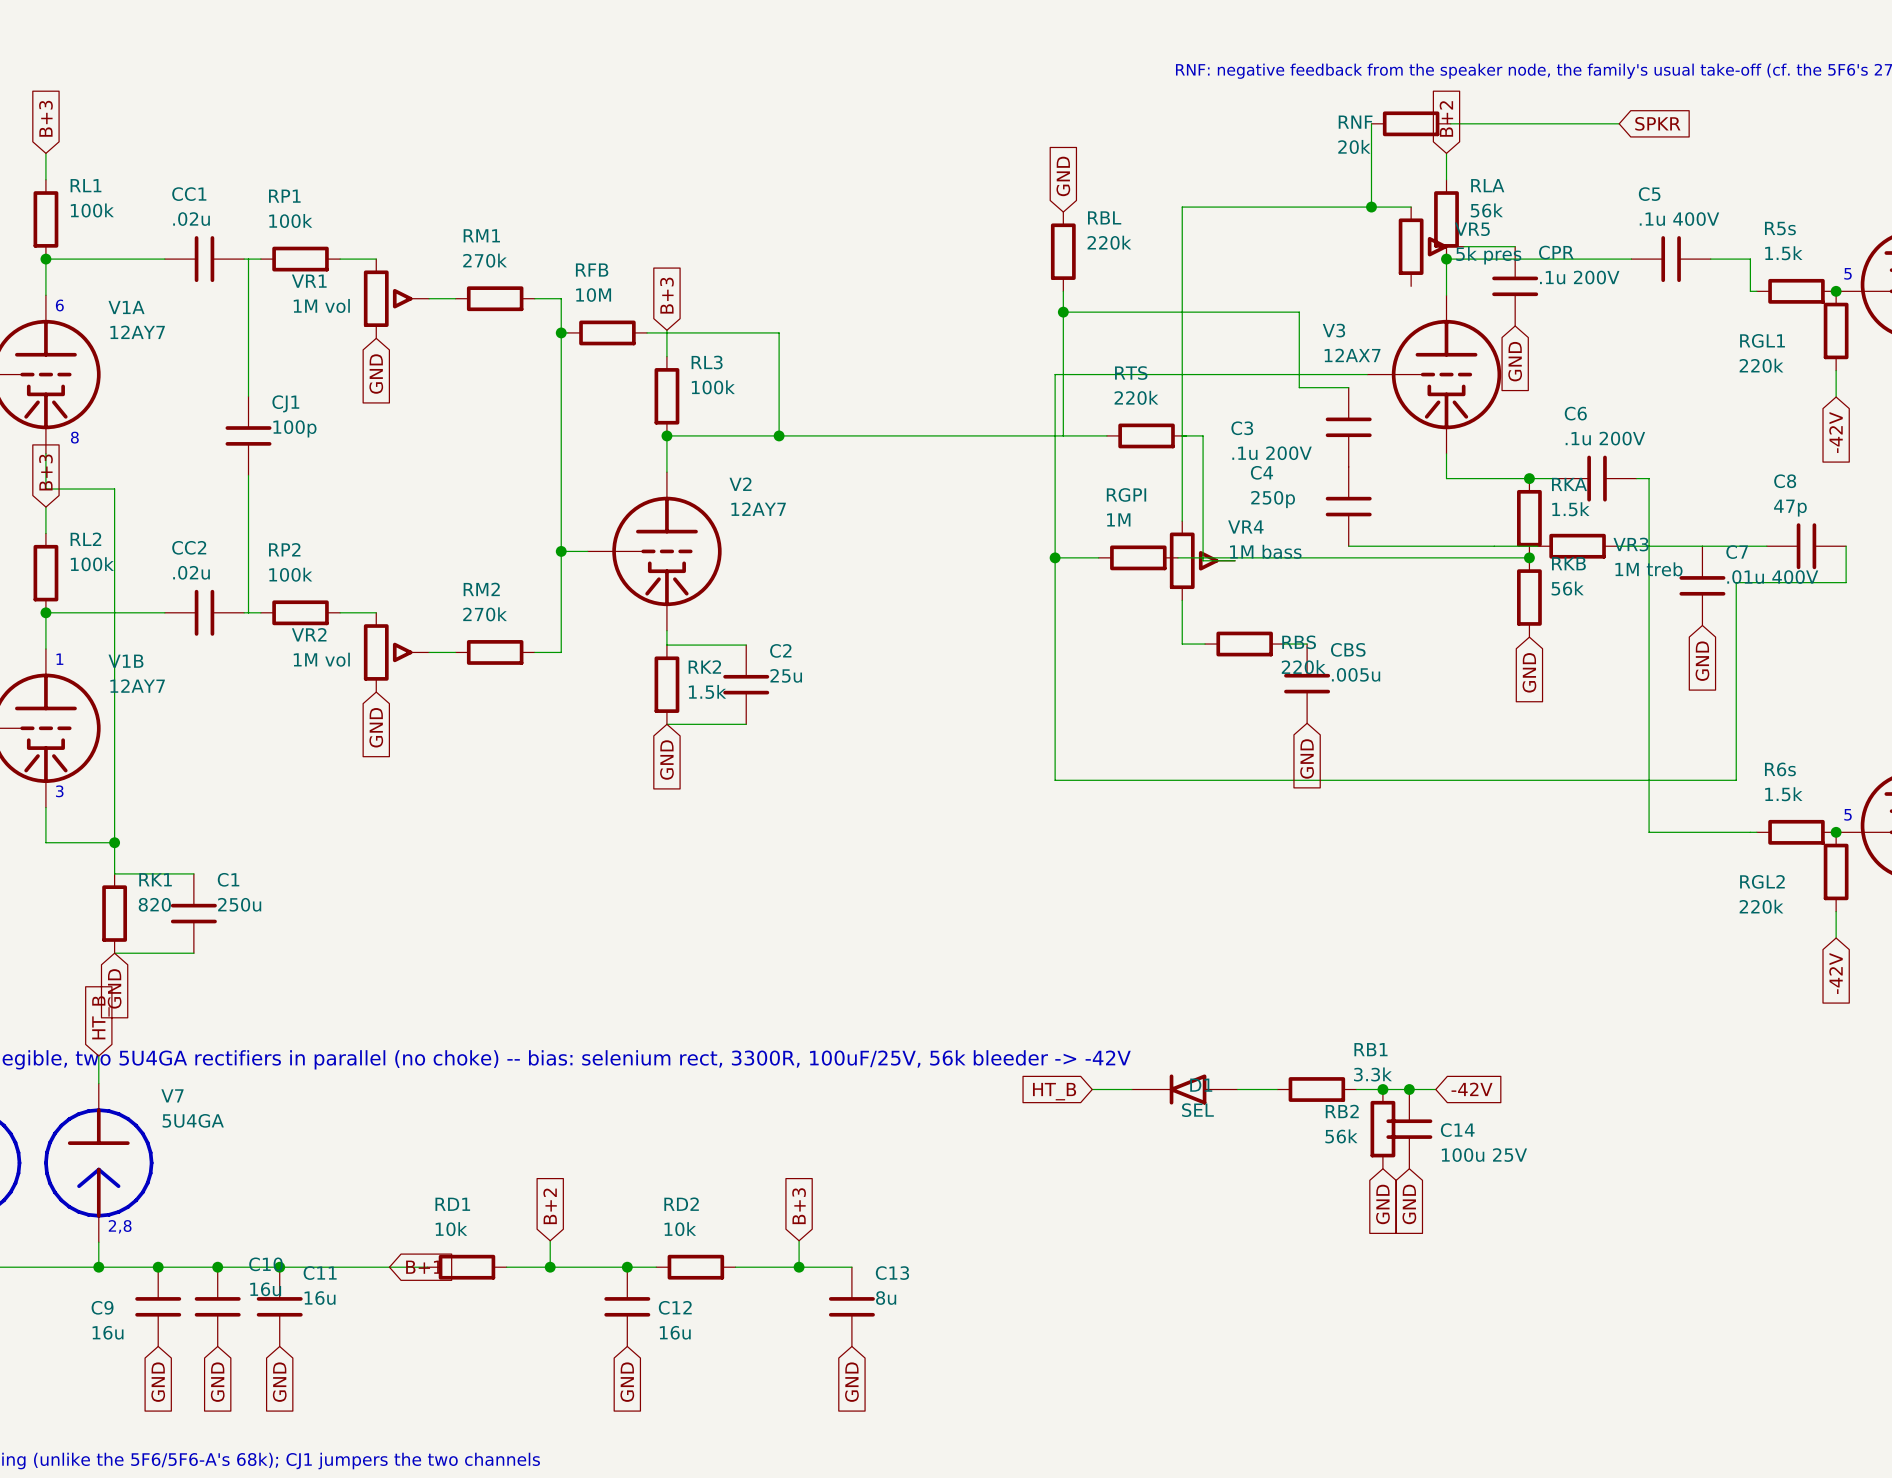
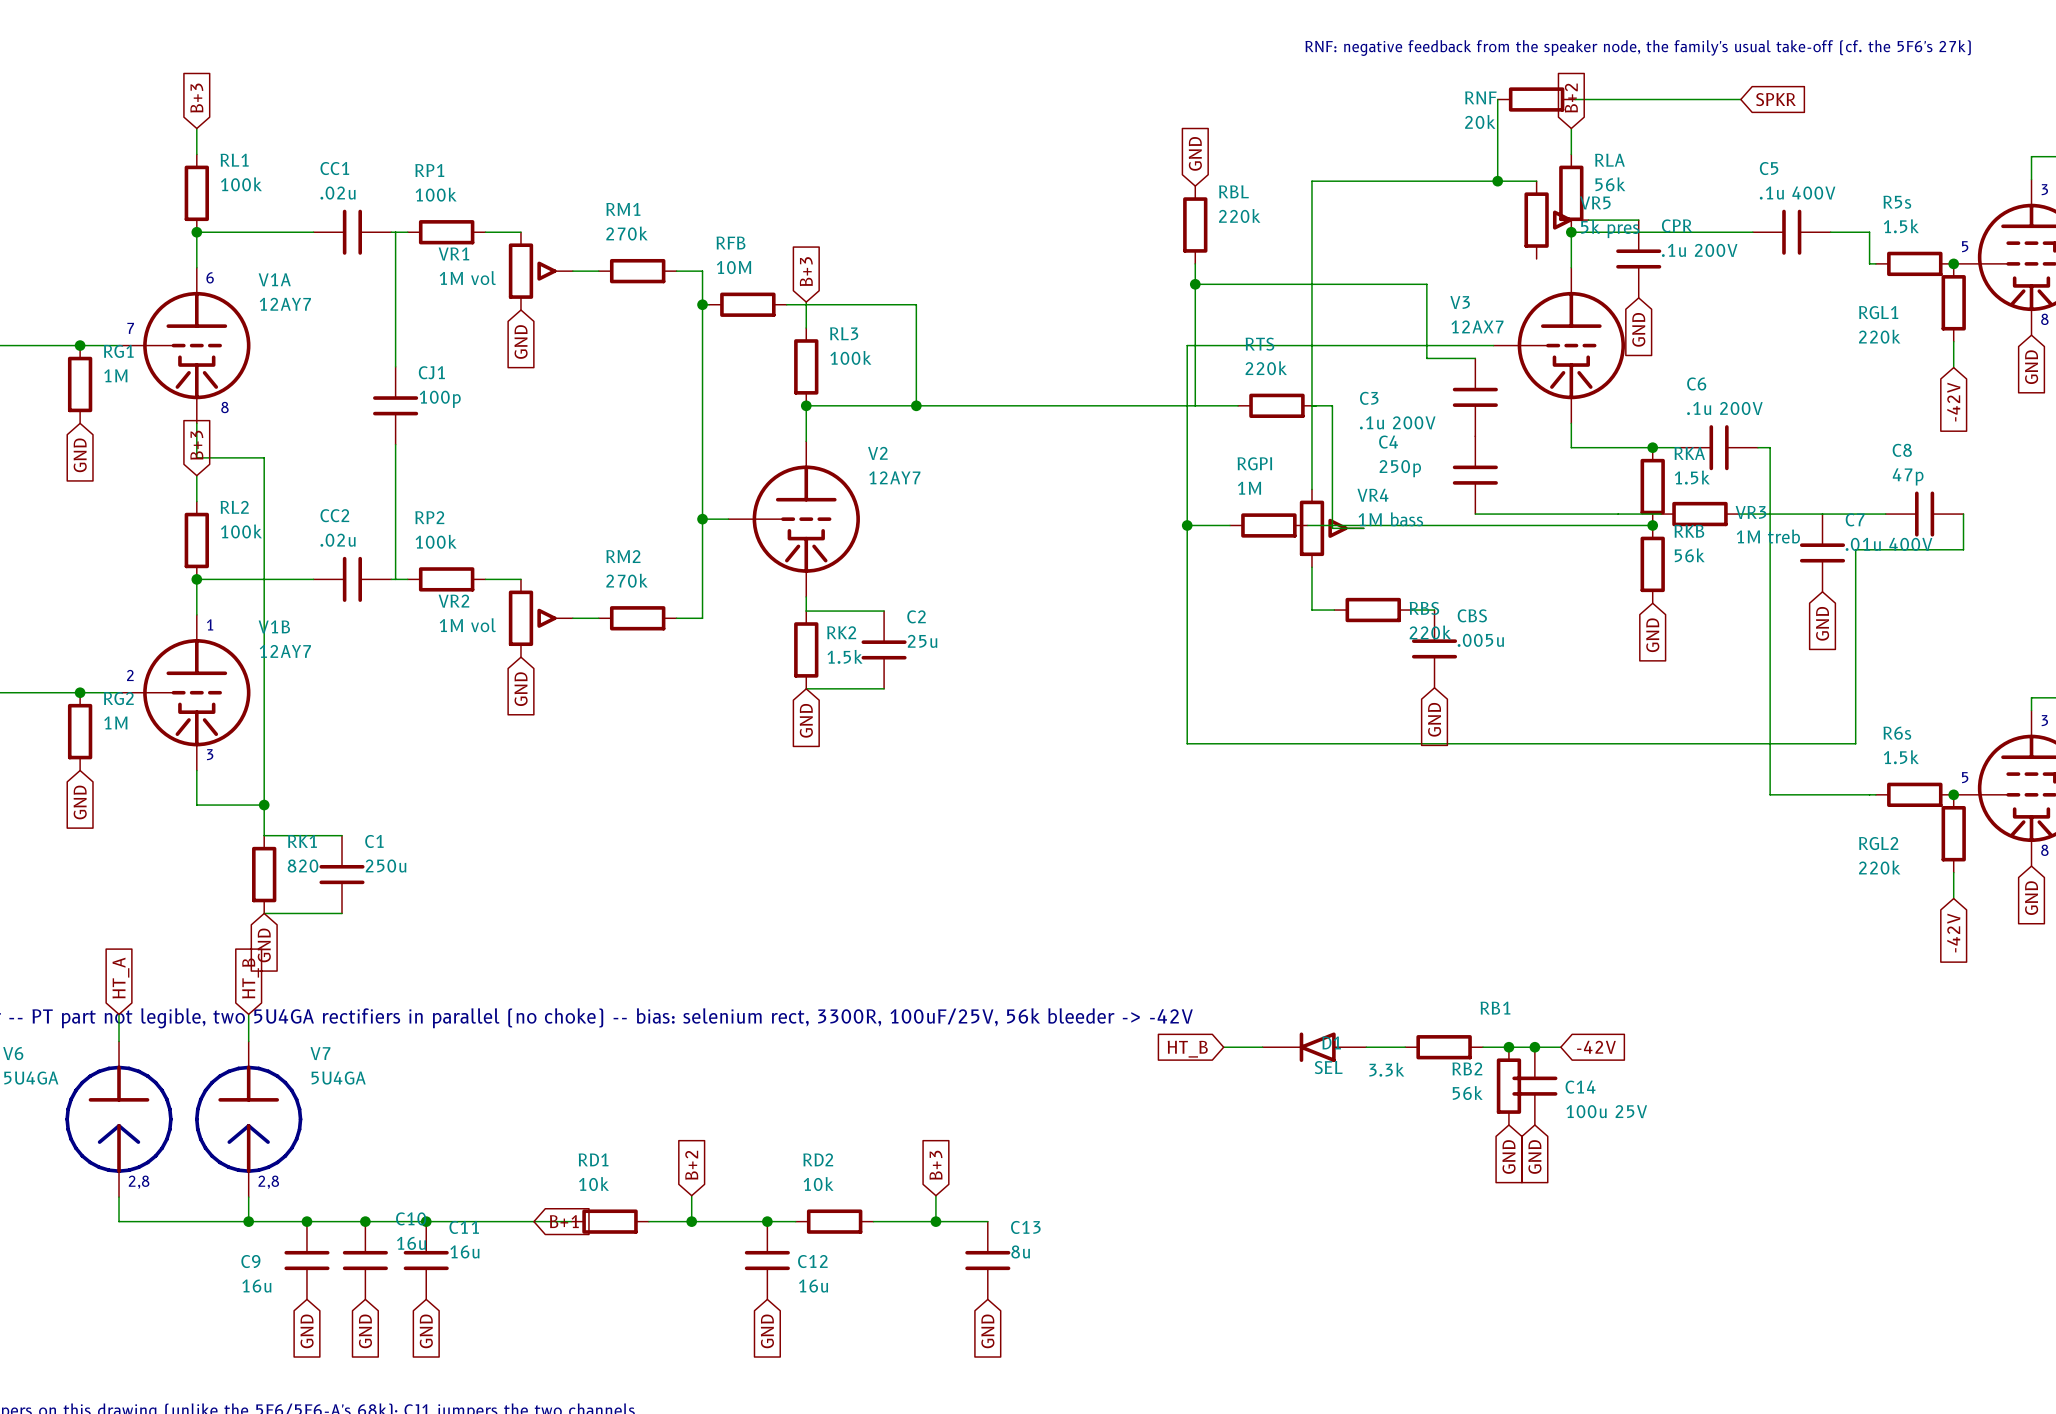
RB1 value position: 3.3k (1372, 1074) -> 3.3k (1386, 1069)

